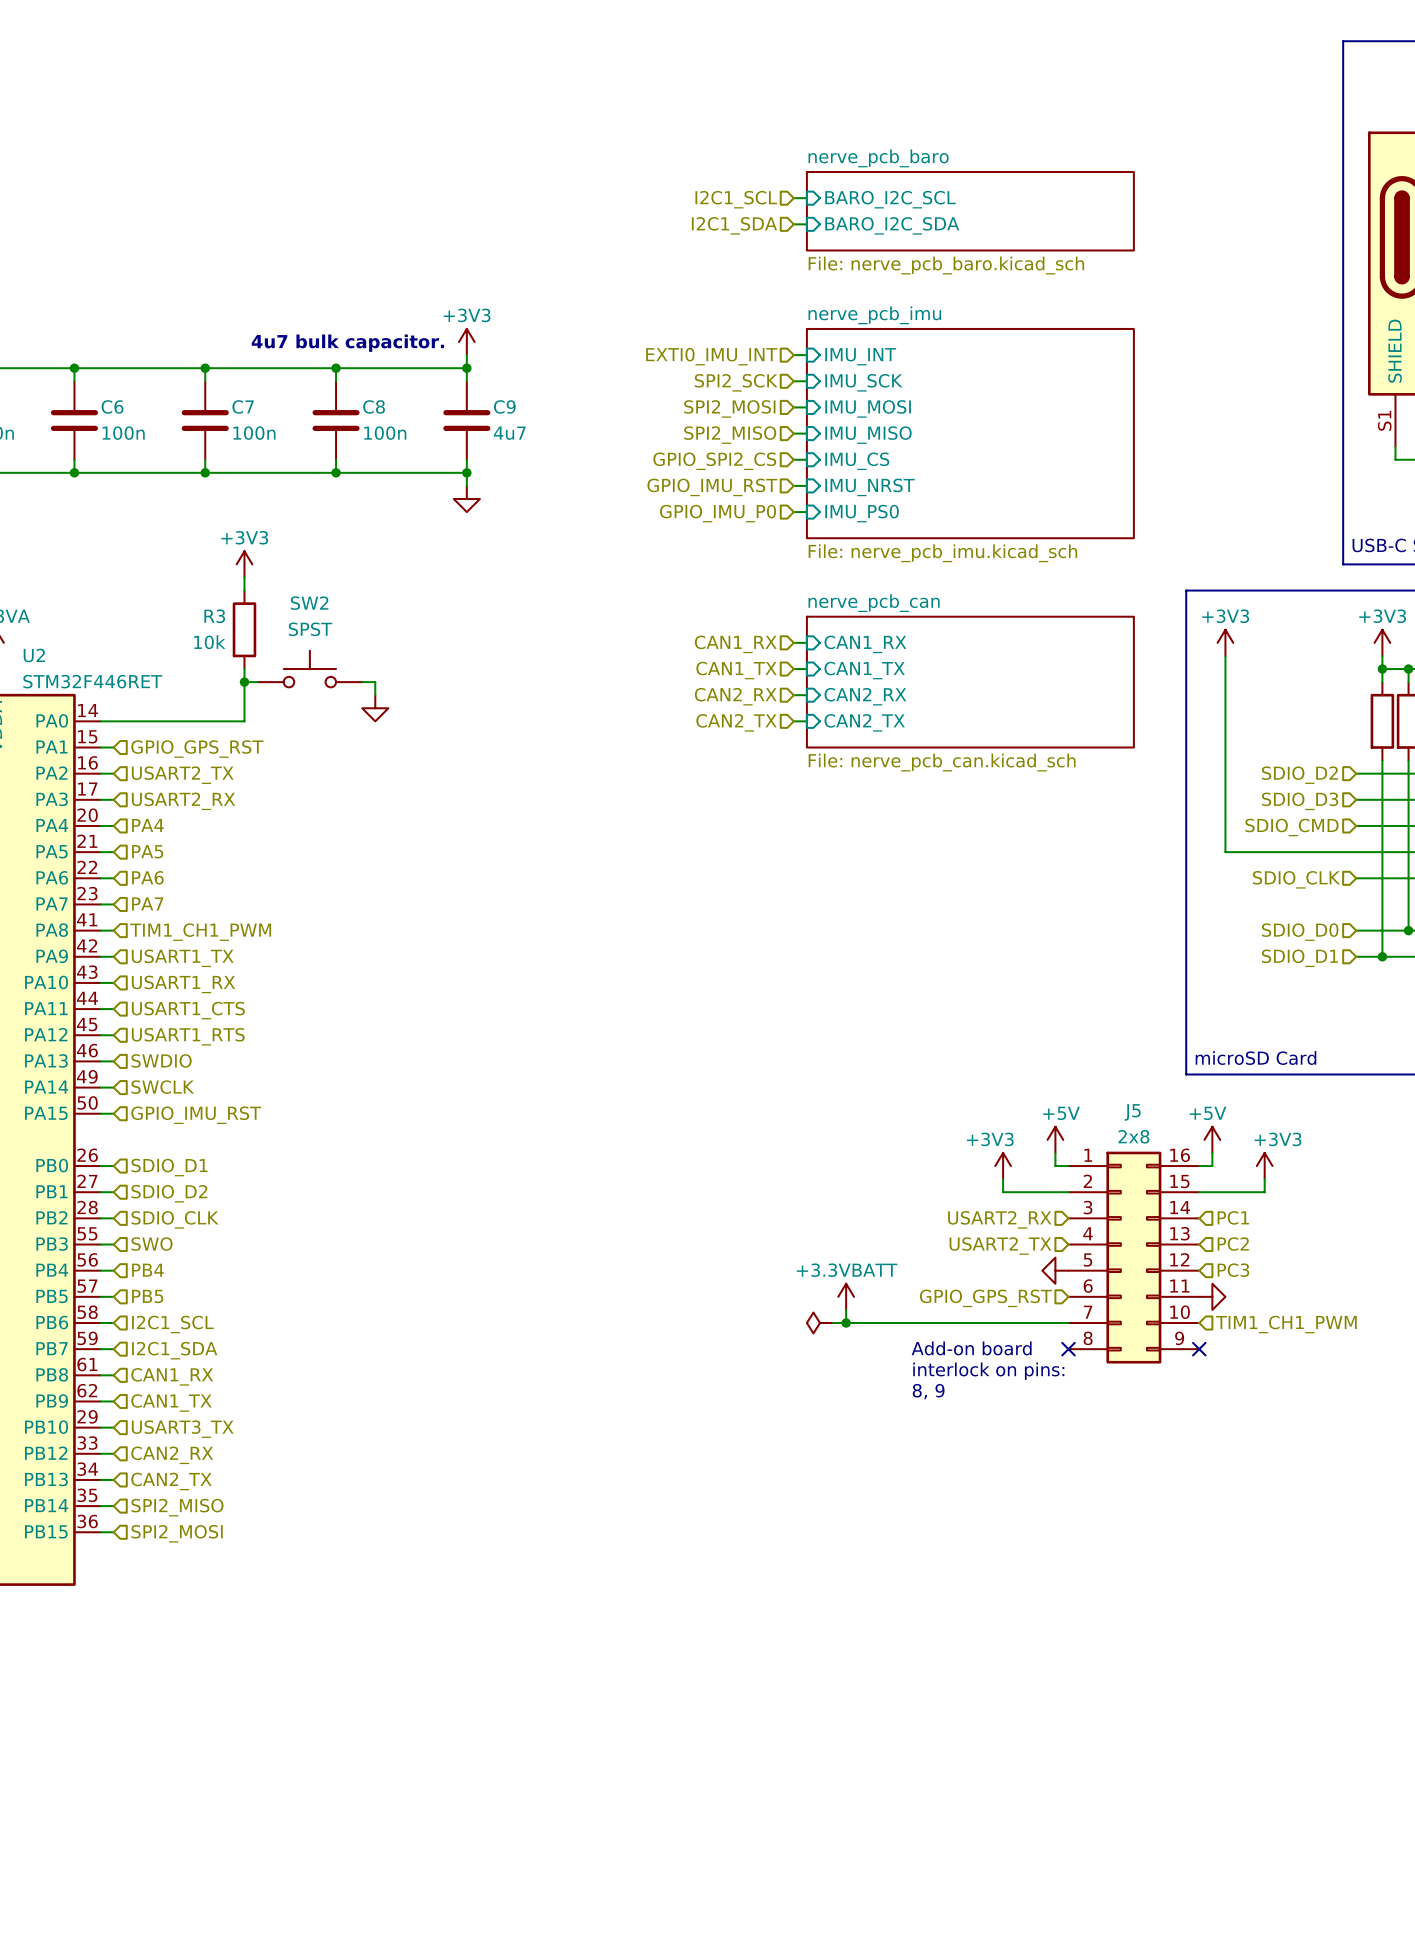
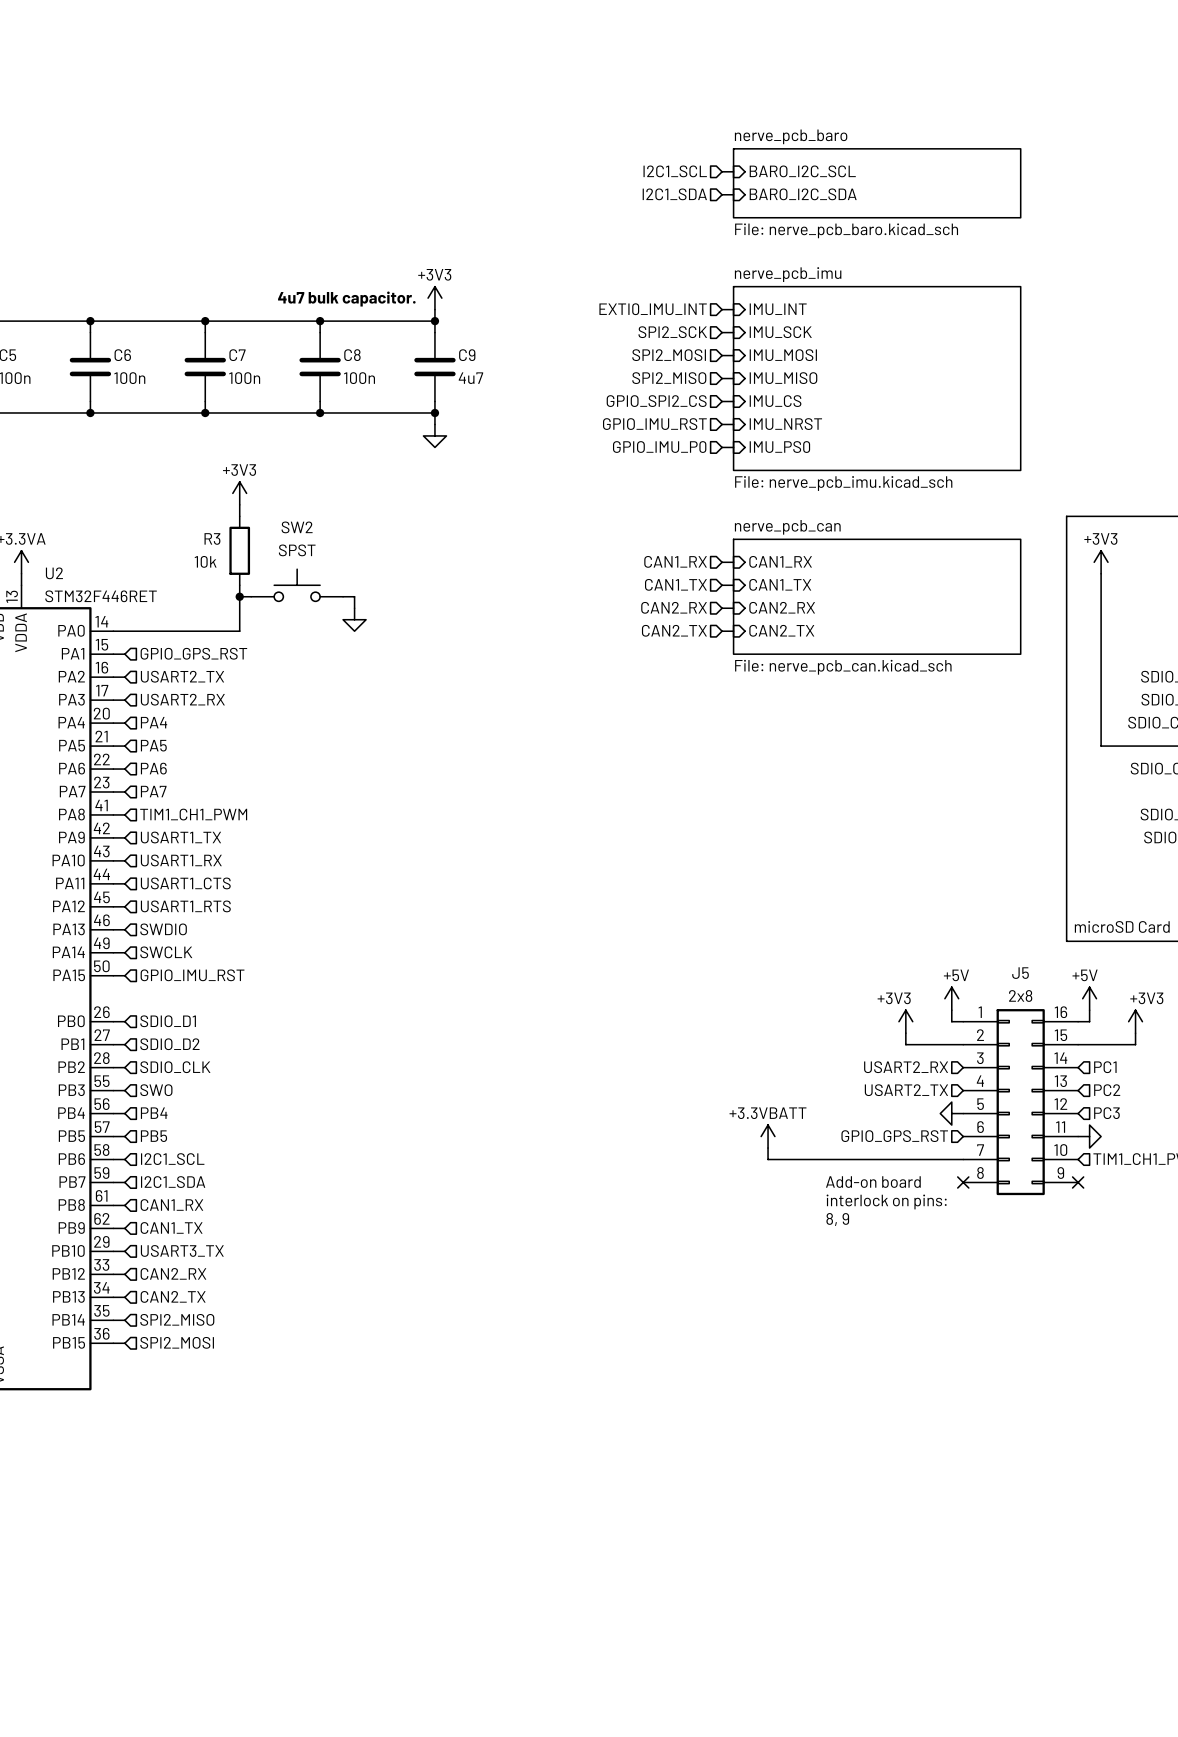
power symbol: (819, 1323) -> none
wire: (833, 1323) (846, 1323) -> none
junction: (846, 1323) -> none

